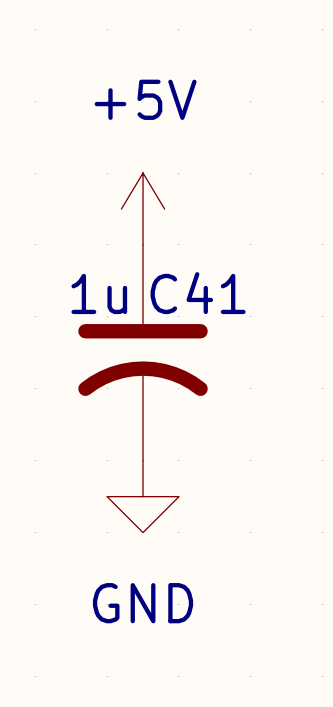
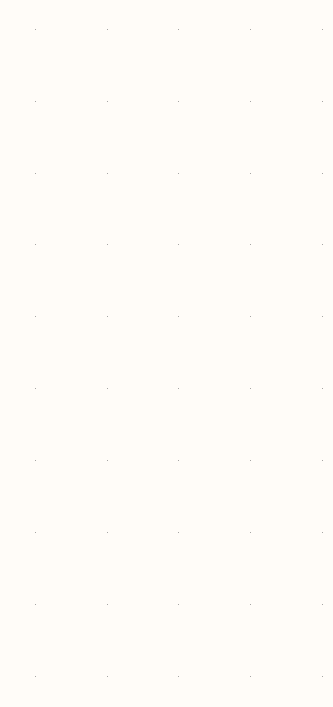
power symbol: +5V (143, 209) -> none
C41: 1u (143, 352) -> none
power symbol: GND (143, 496) -> none

